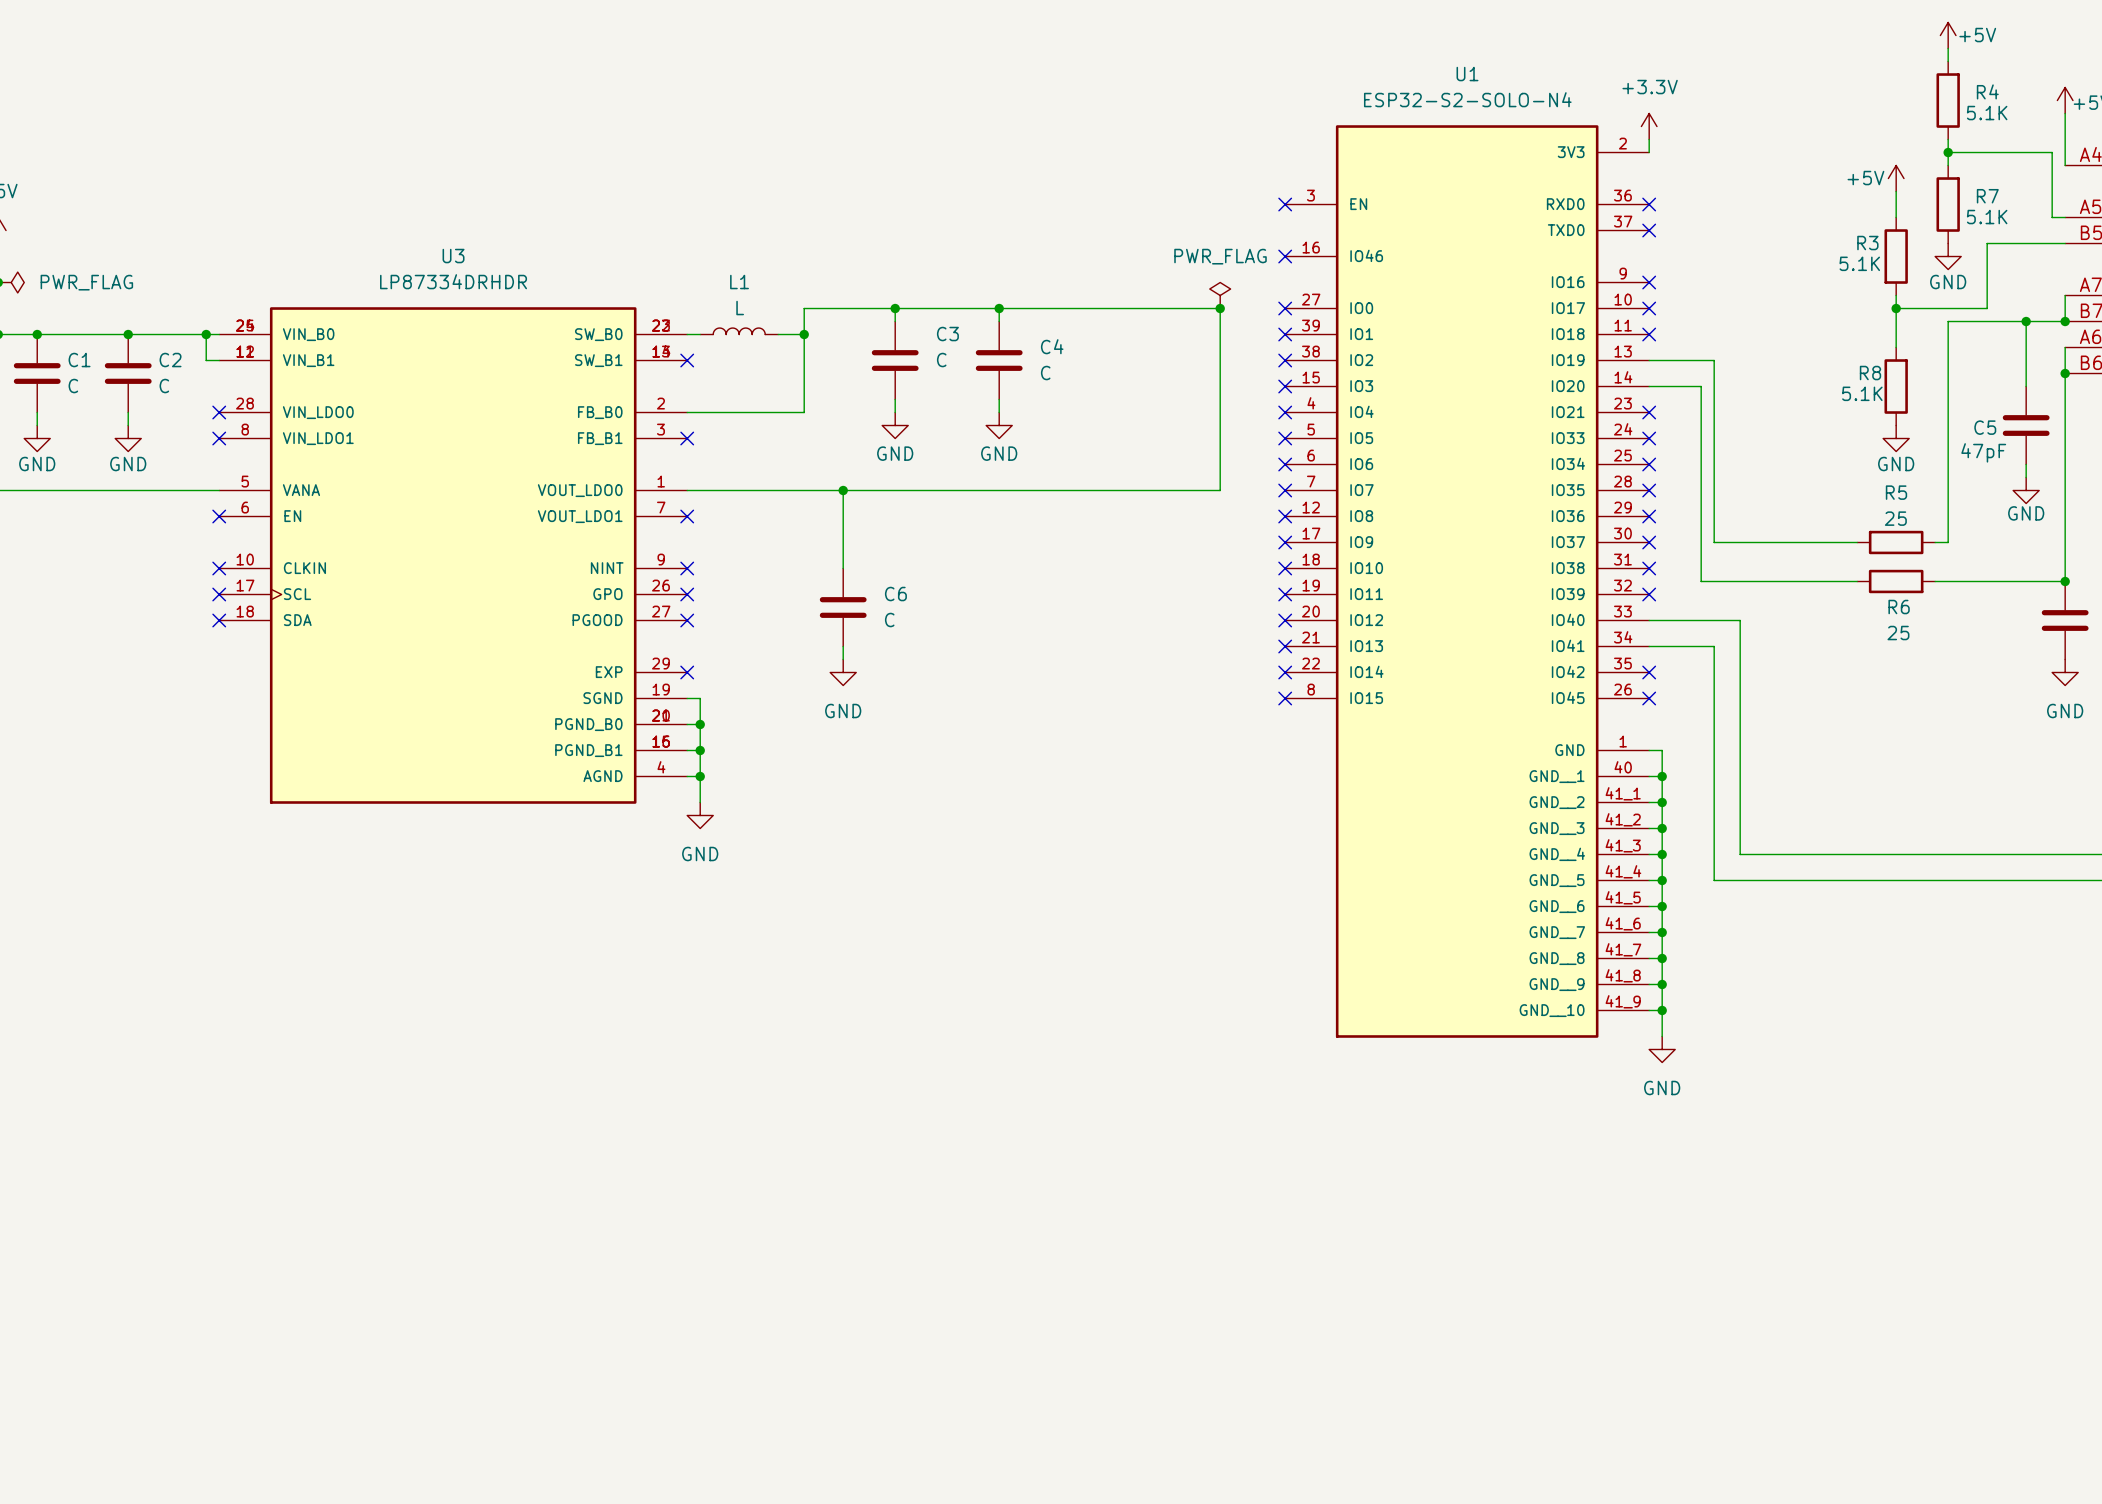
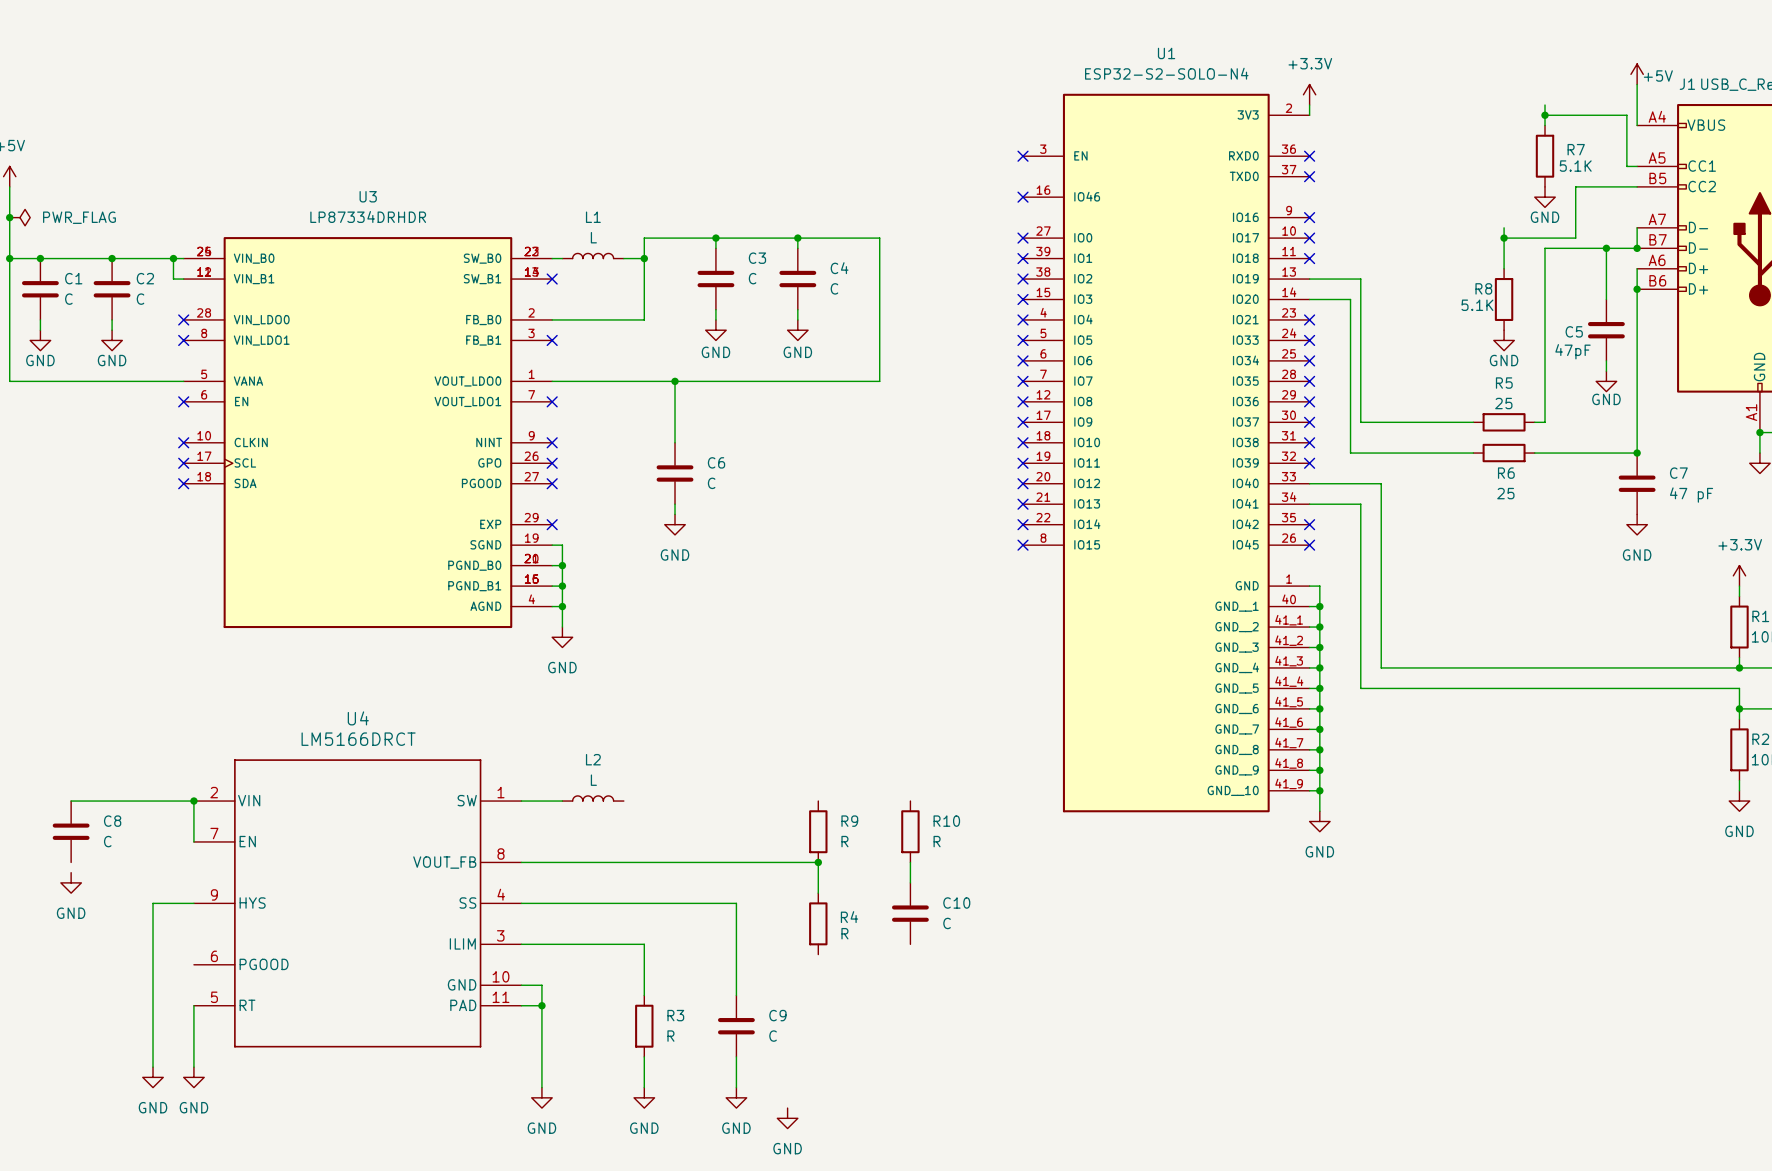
power symbol: +5V (1948, 35) -> none
wire: (1948, 48) (1948, 61) -> none
R4 position: (1948, 100) -> (818, 923)
R4 value: 5.1K (1987, 113) -> R (844, 933)
power symbol: +5V (1896, 178) -> none
wire: (1896, 191) (1896, 217) -> none
R3 name position: R3 (1867, 243) -> R3 (675, 1015)
R3 position: (1896, 256) -> (644, 1026)
R3 value: 5.1K (1859, 263) -> R (670, 1036)
power symbol: PWR_FLAG (1220, 295) -> none
wire: (1103, 308) (1220, 308) (1220, 490) (1103, 490) -> (879, 238) (879, 381)
junction: (1220, 308) -> none
L2: none -> L (593, 798)
wire: none -> (71, 801) (193, 801) (193, 841)
junction: none -> (193, 801)
wire: none -> (521, 801) (562, 801)
C8: none -> C (71, 831)
R9: none -> R (818, 831)
R10: none -> R (910, 831)
wire: none -> (521, 862) (818, 862) (818, 893)
junction: none -> (818, 862)
wire: none -> (910, 862) (910, 882)
power symbol: none -> GND (71, 882)
wire: none -> (193, 903) (153, 903) (153, 1067)
U4: none -> LM5166DRCT (357, 903)
wire: none -> (521, 903) (736, 903) (736, 995)
C10: none -> C (910, 913)
wire: none -> (521, 944) (644, 944) (644, 995)
wire: none -> (521, 985) (541, 985) (541, 1087)
wire: none -> (193, 1005) (193, 1067)
wire: none -> (521, 1005) (541, 1005)
junction: none -> (541, 1005)
C9: none -> C (736, 1026)
wire: none -> (644, 1056) (644, 1087)
wire: none -> (736, 1056) (736, 1087)
power symbol: none -> GND (153, 1077)
power symbol: none -> GND (193, 1077)
power symbol: none -> GND (541, 1097)
power symbol: none -> GND (644, 1097)
power symbol: none -> GND (736, 1097)
power symbol: none -> GND (787, 1118)

